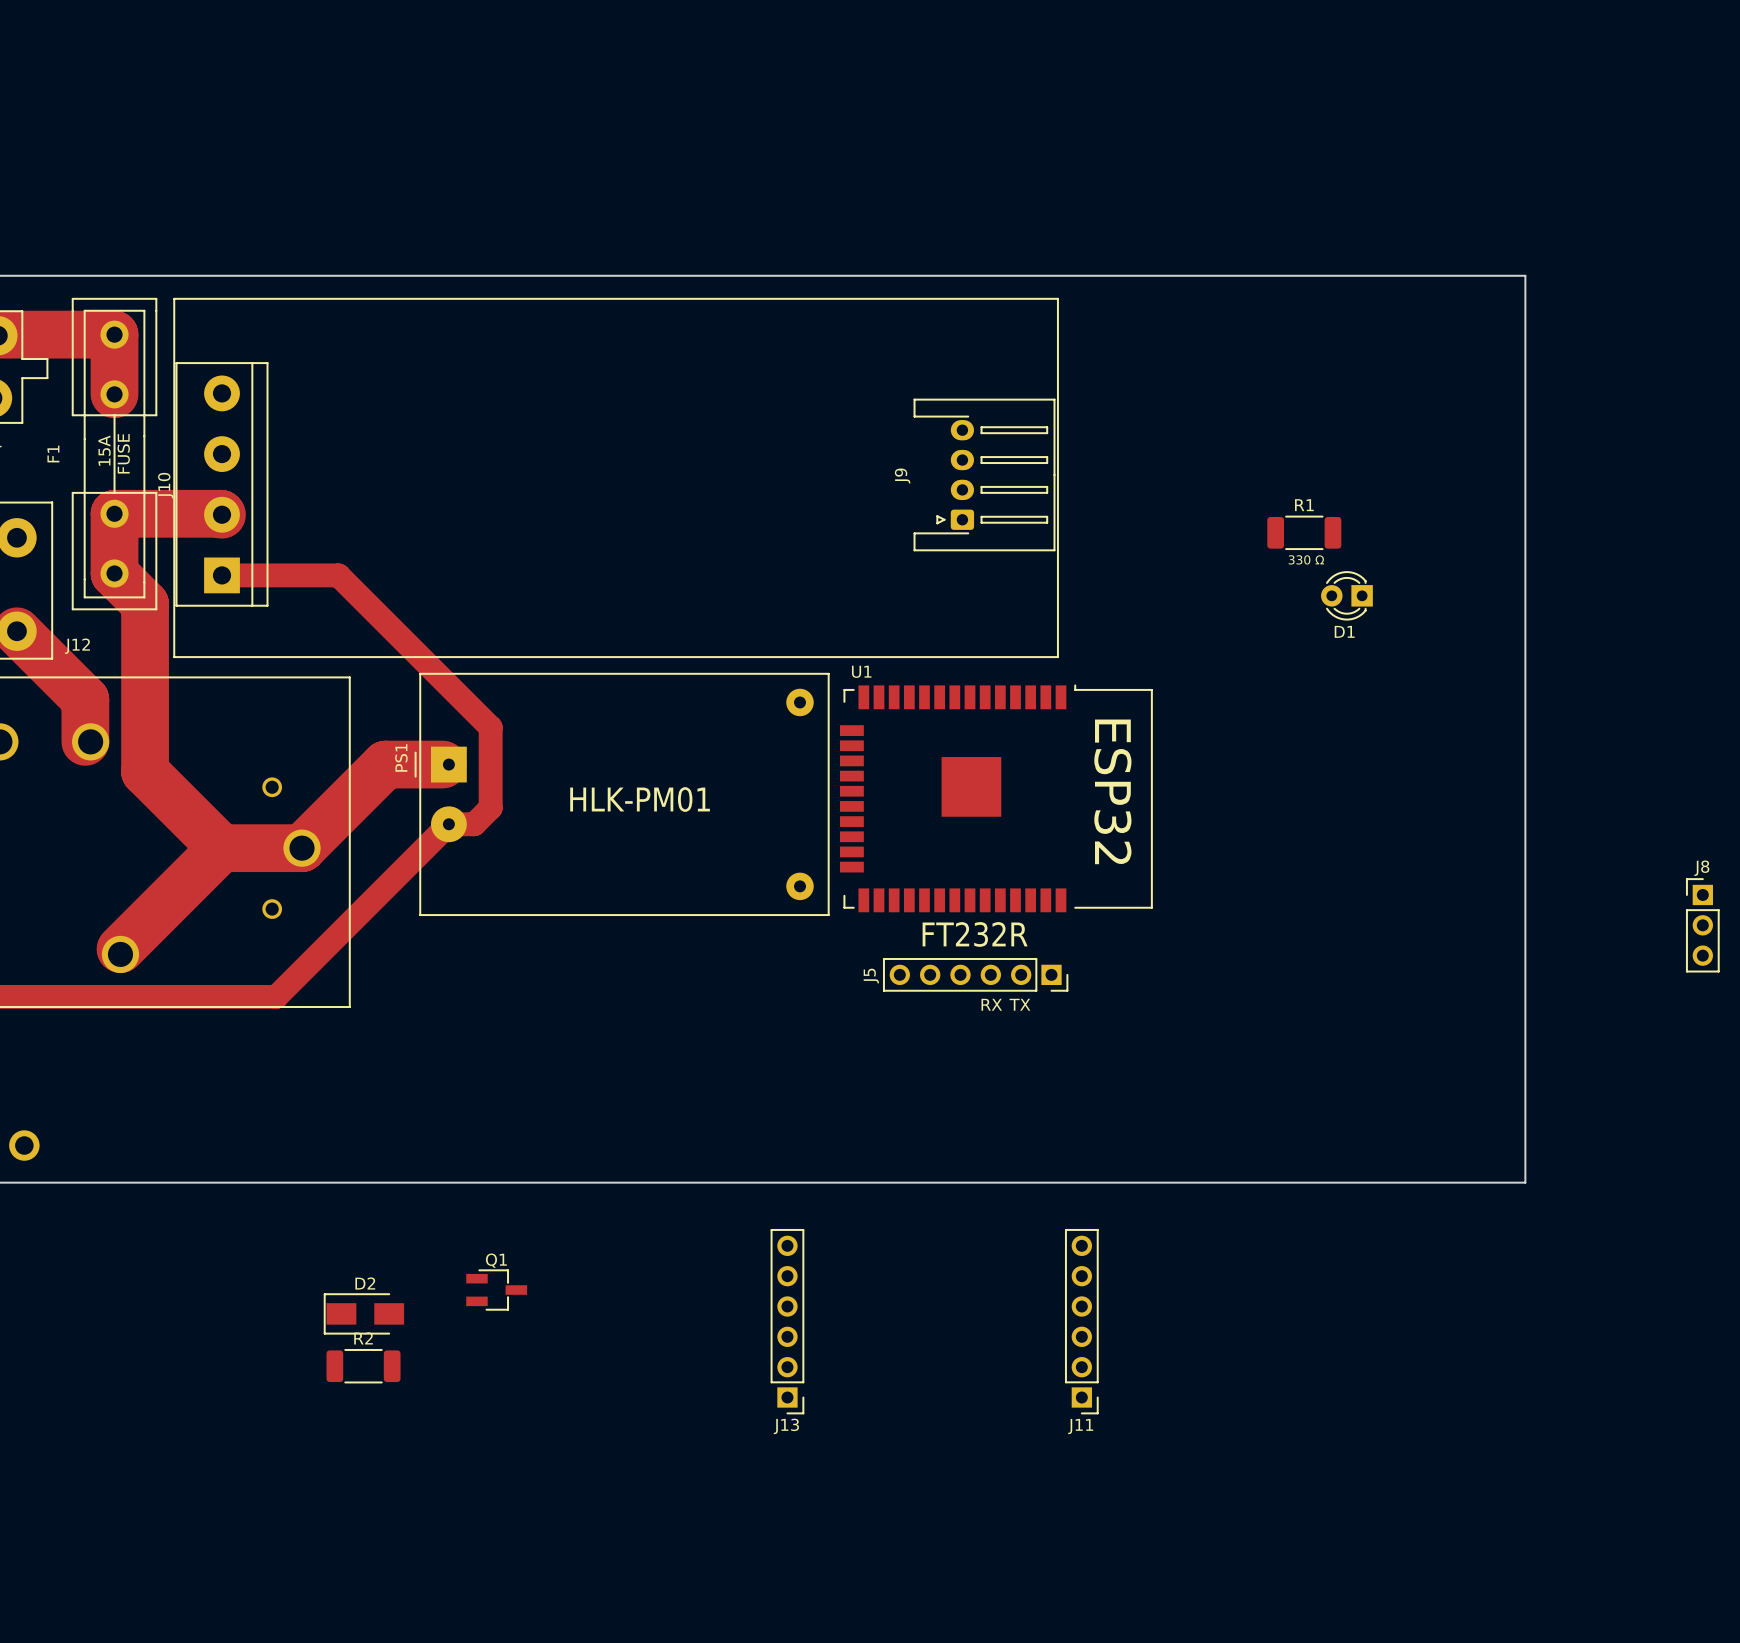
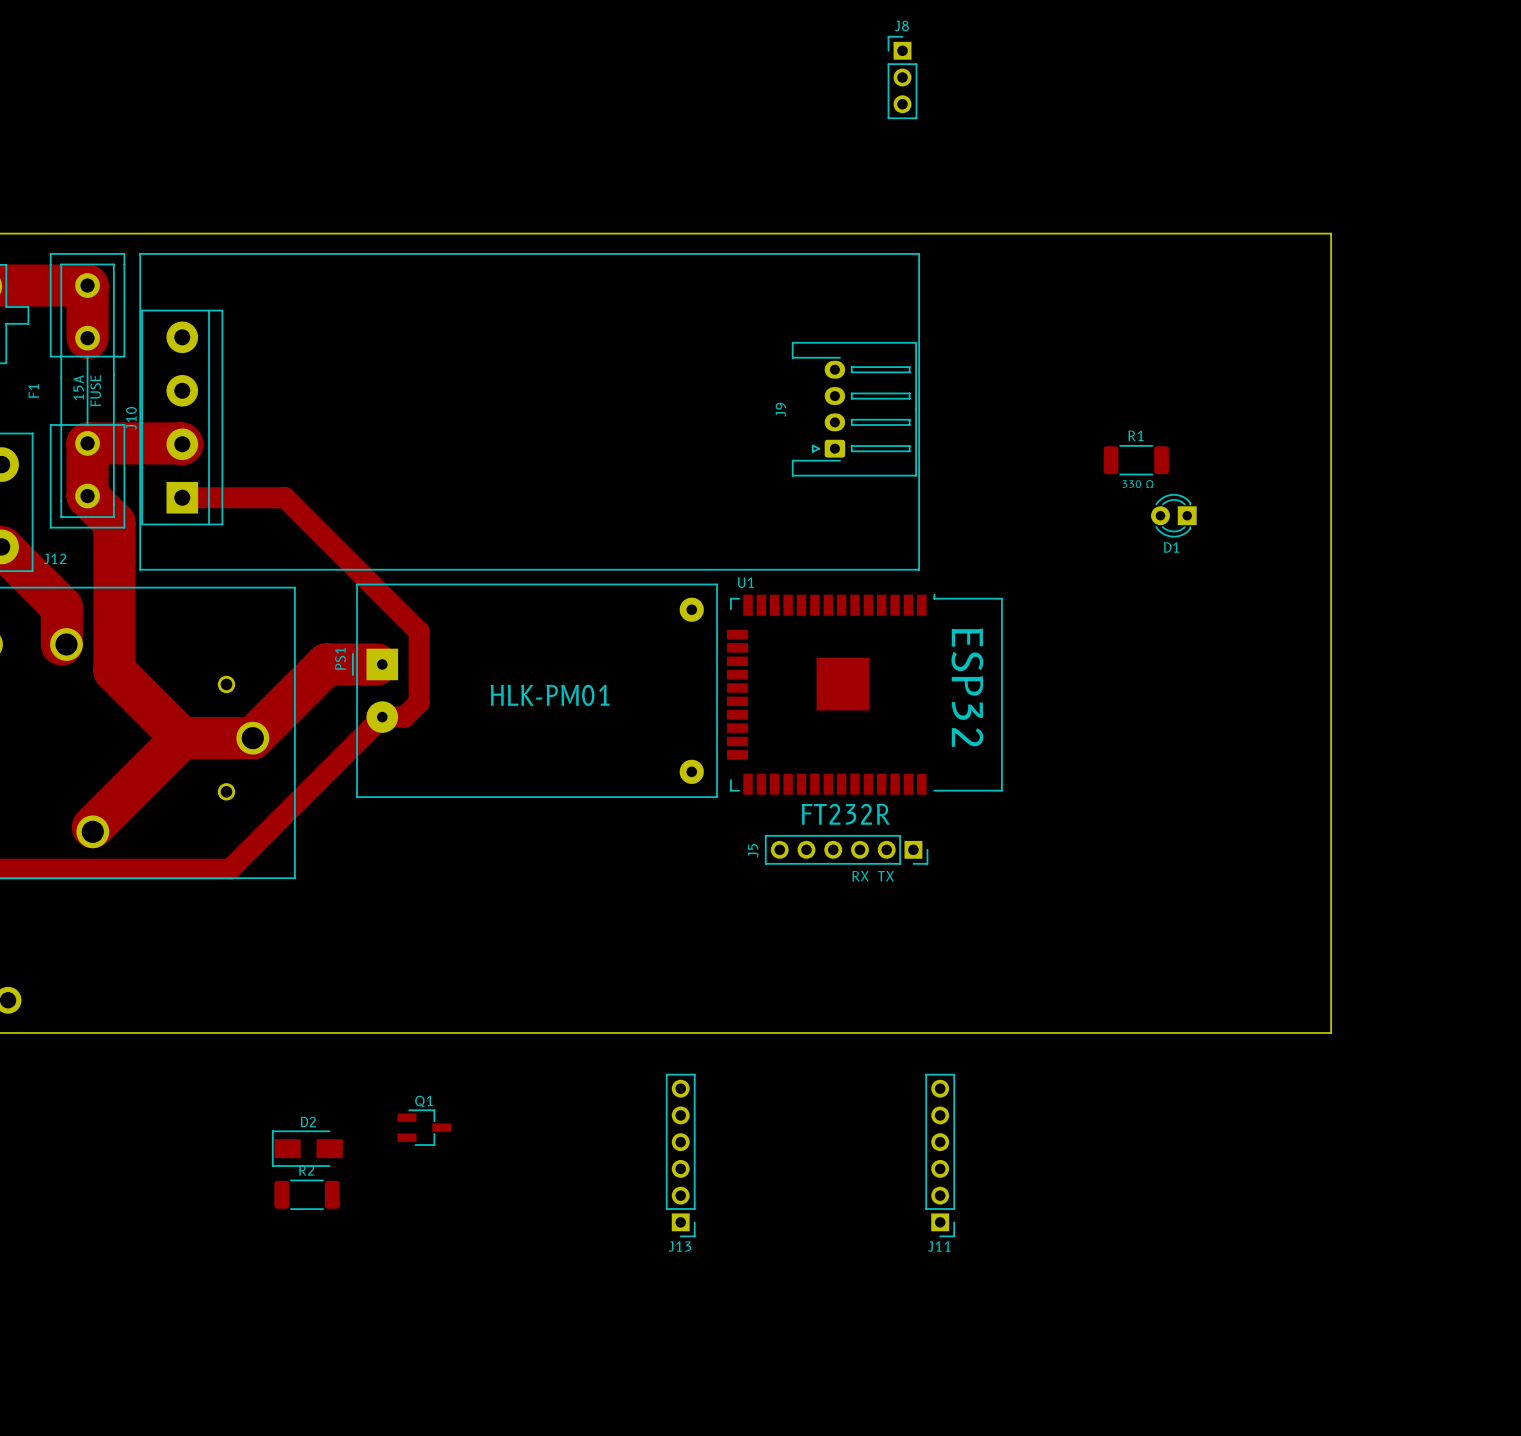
J8 position: (1702, 925) -> (902, 77)

